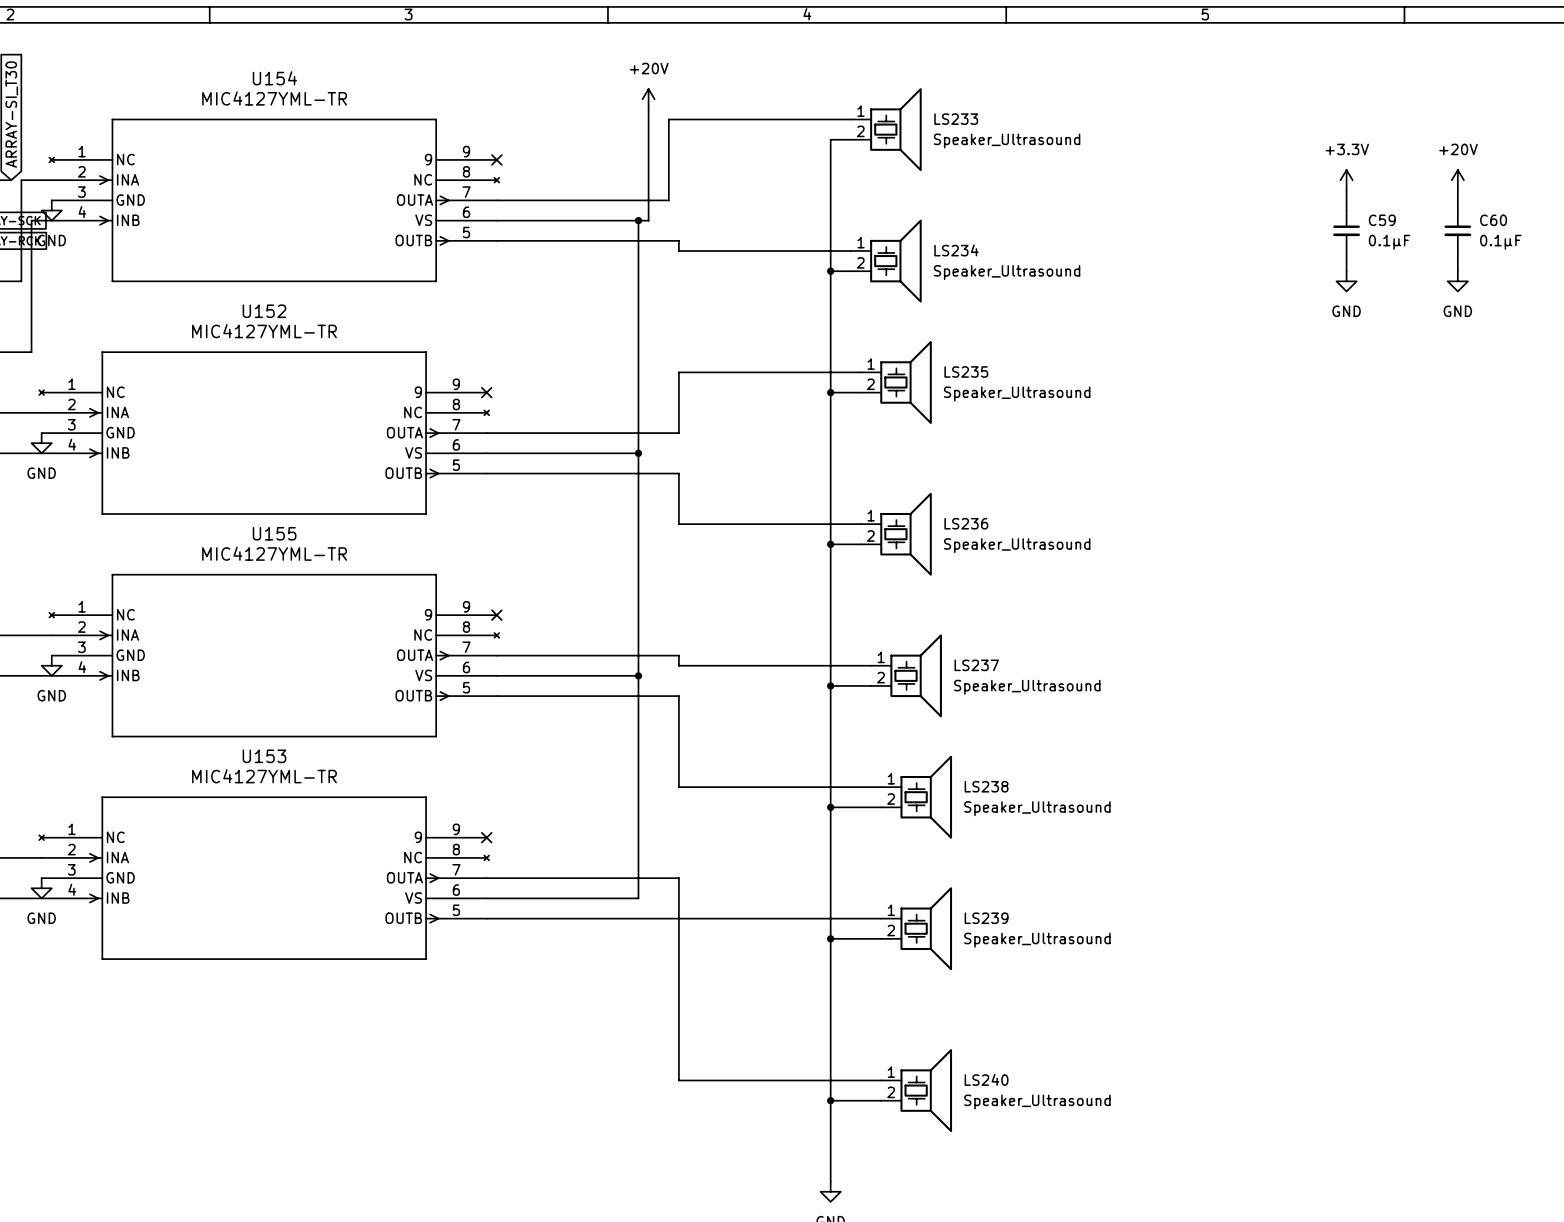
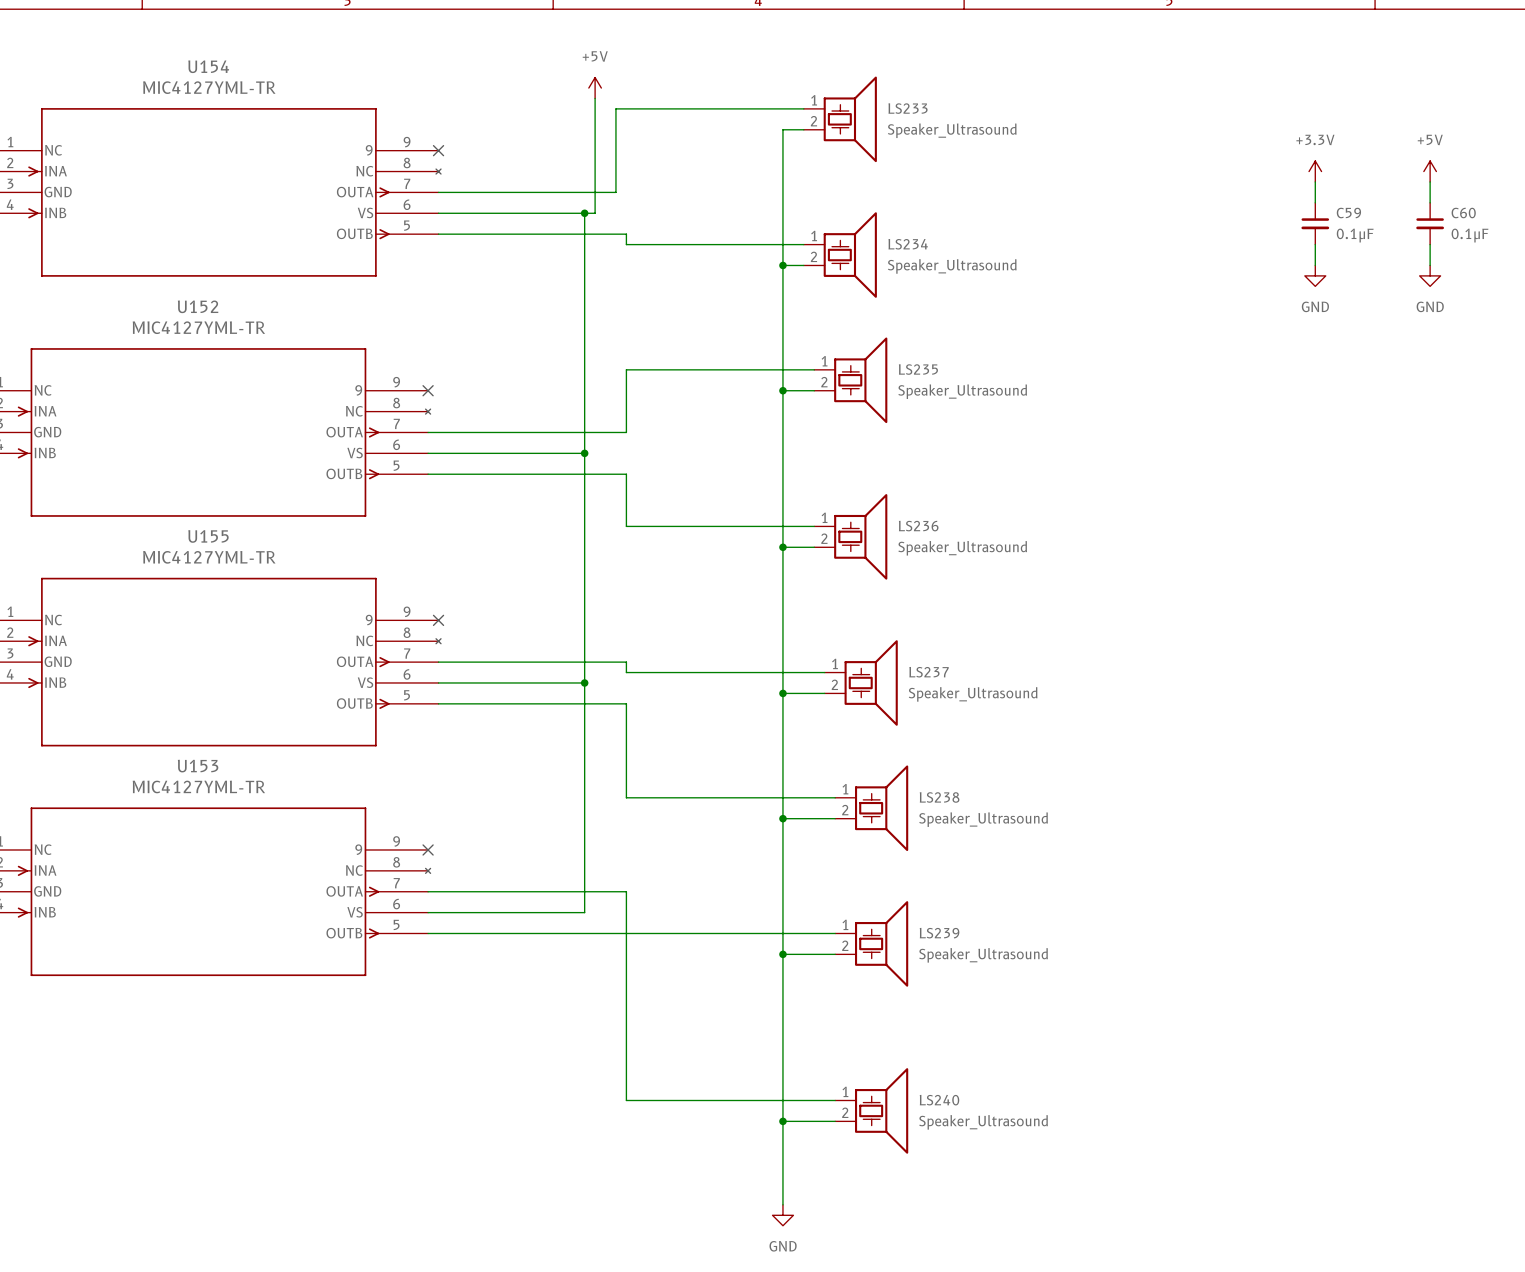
power symbol: +20V (648, 99) -> +5V (595, 88)
power symbol: +20V (1457, 180) -> +5V (1430, 171)

